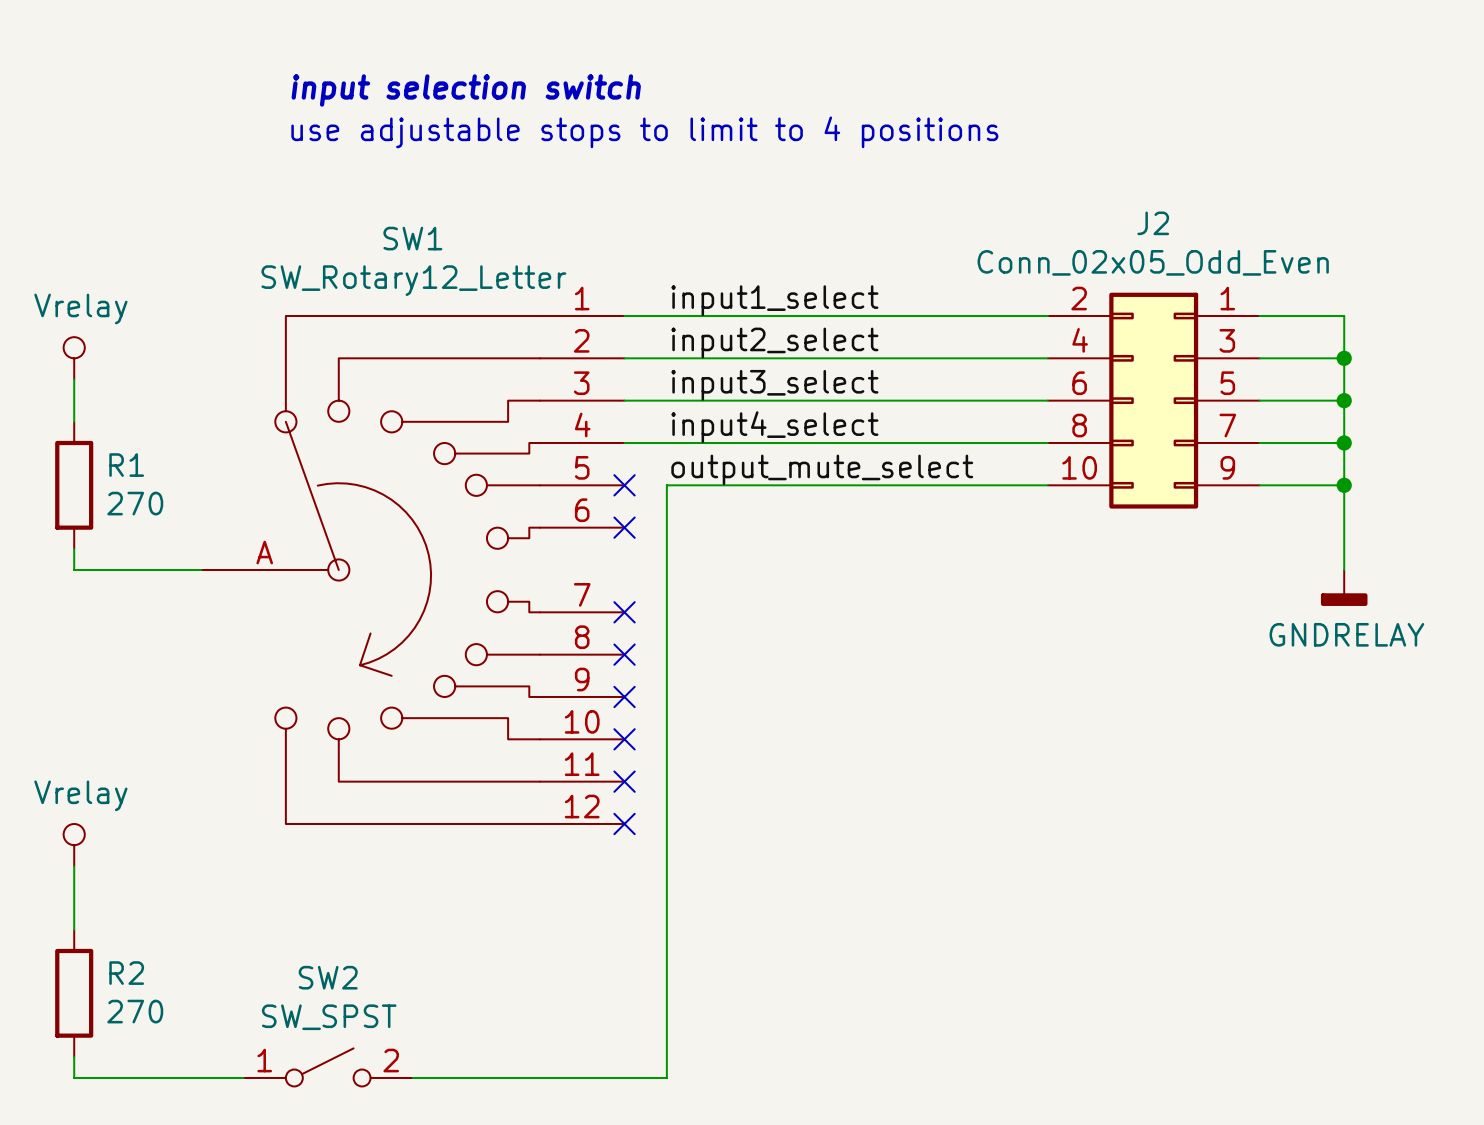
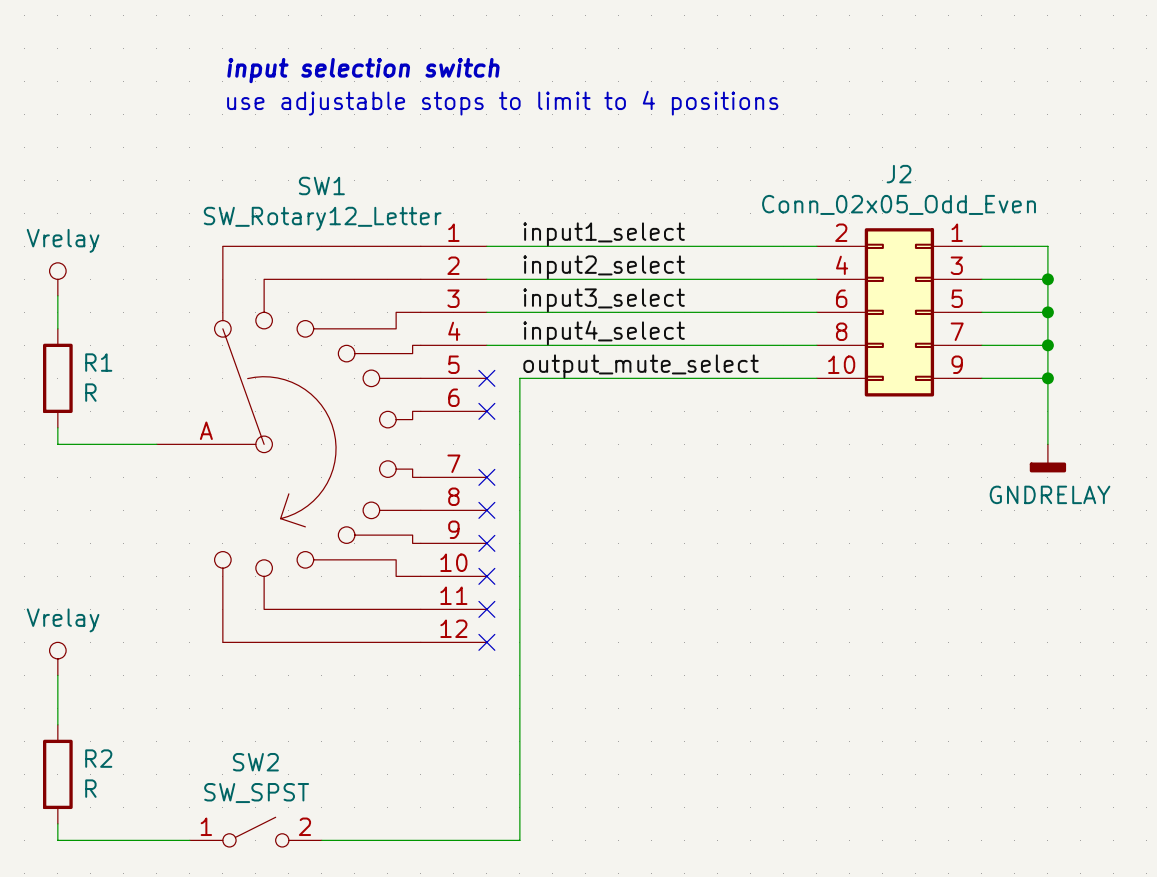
R1 value: 270 (135, 503) -> R (90, 392)
R2 value: 270 (135, 1011) -> R (90, 788)

